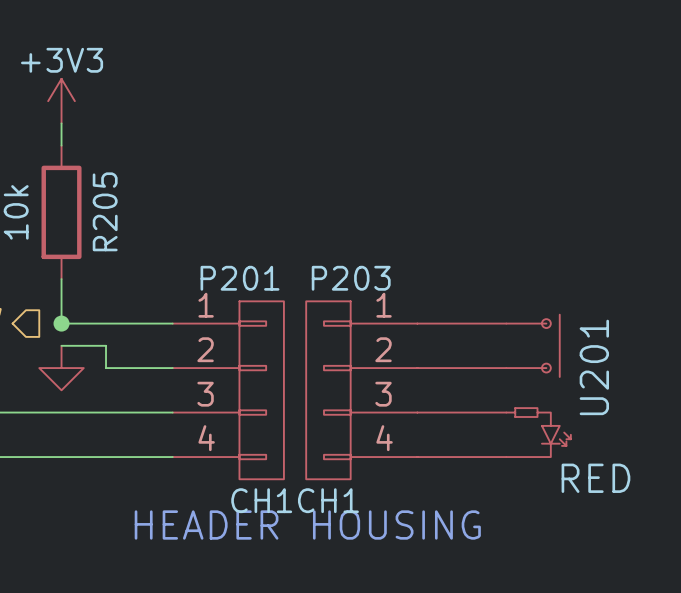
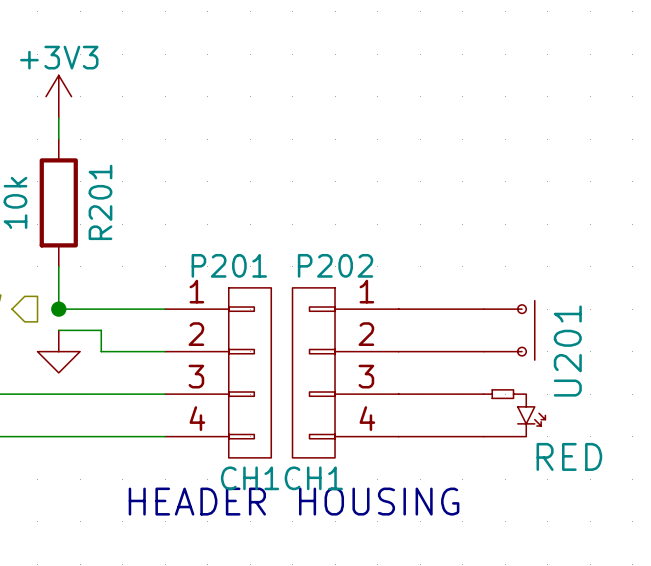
R205 name: R205 (105, 211) -> R201 (100, 202)
P203 name: P203 (351, 278) -> P202 (335, 265)

